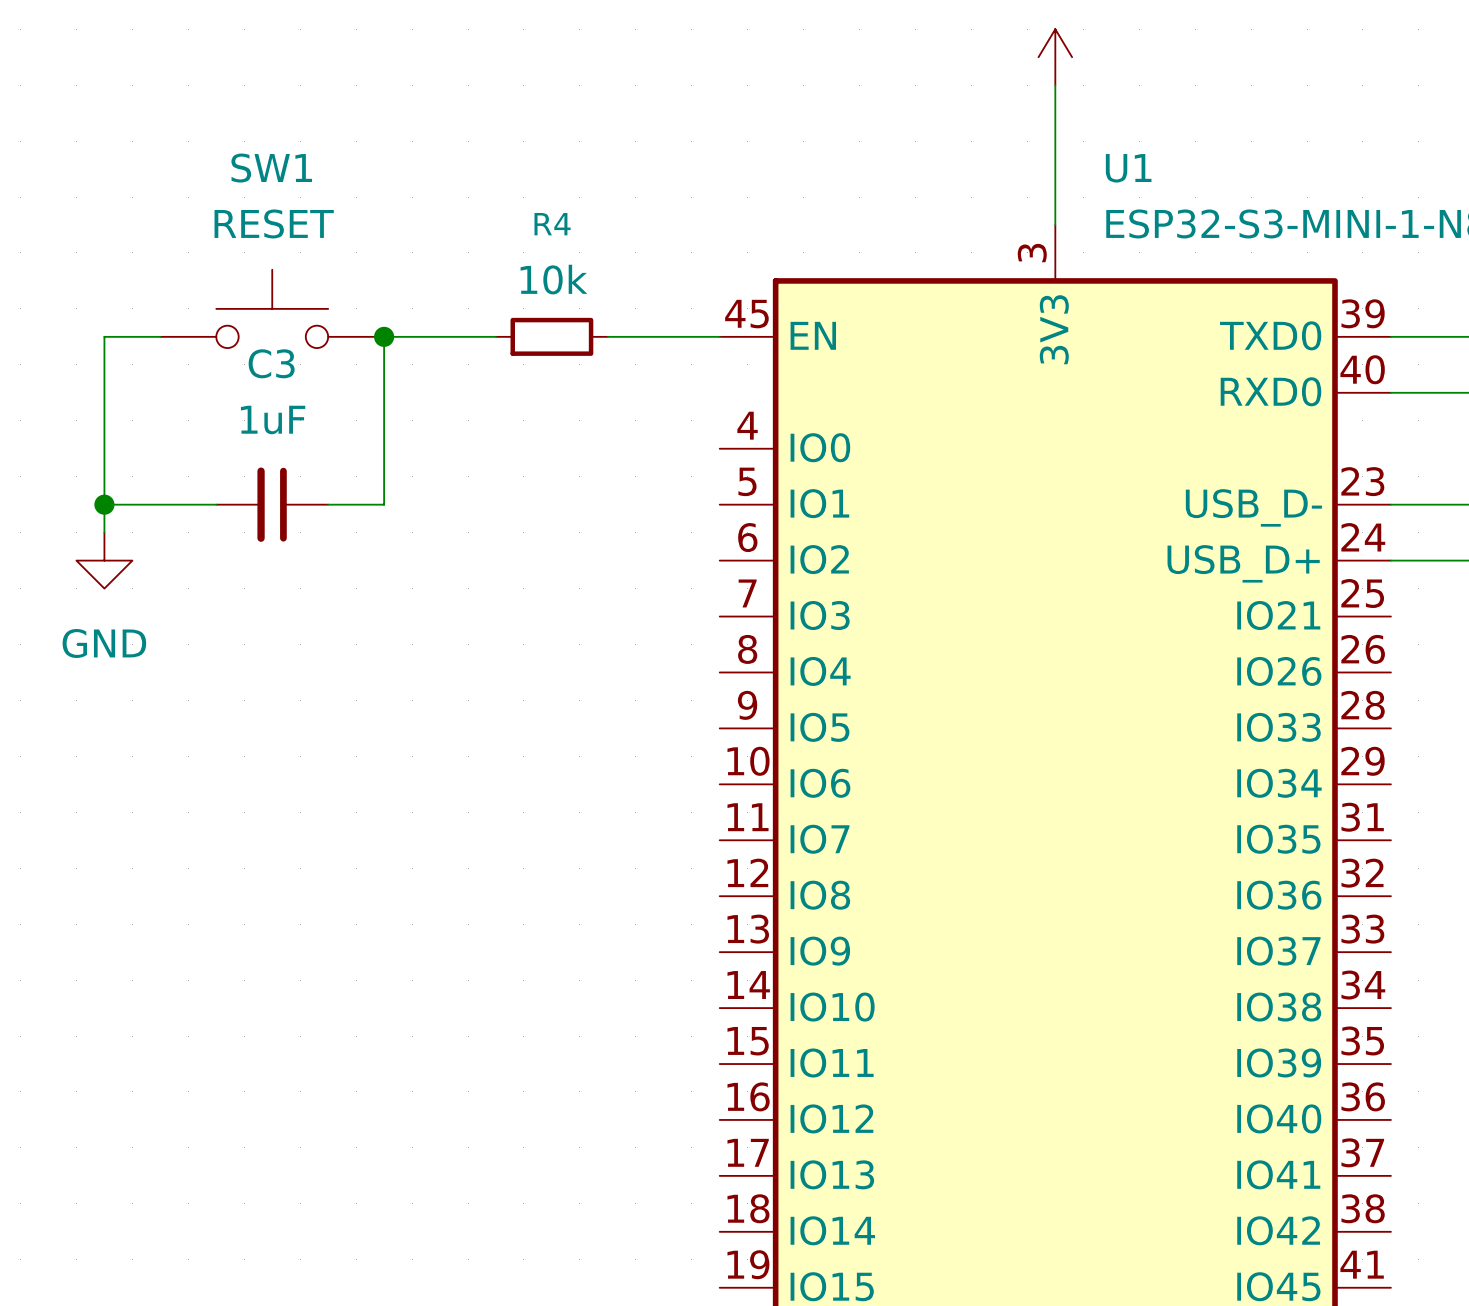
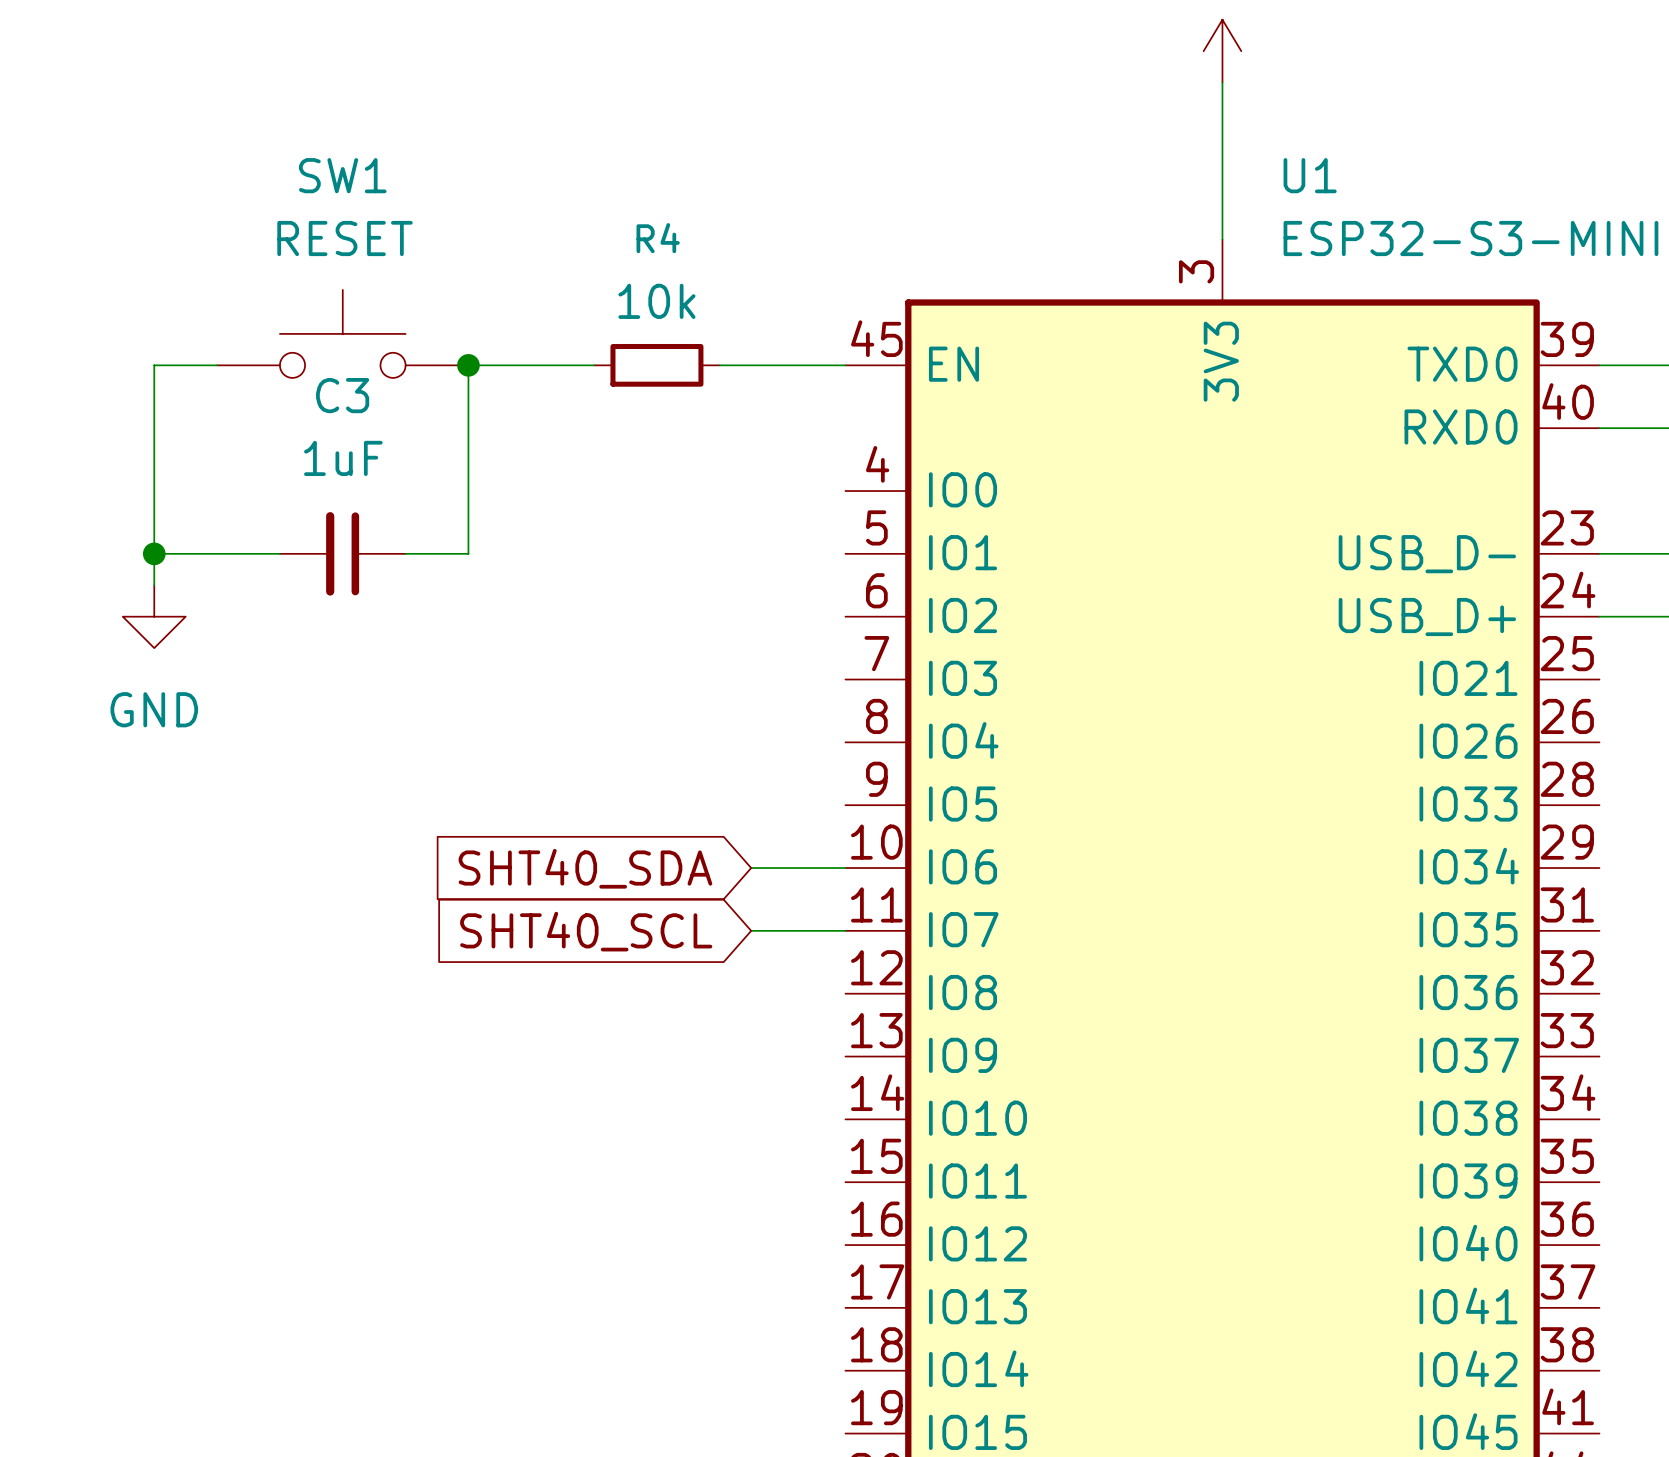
wire: none -> (751, 868) (845, 868)
global label: none -> SHT40_SDA (585, 868)
wire: none -> (751, 930) (845, 930)
global label: none -> SHT40_SCL (586, 931)

